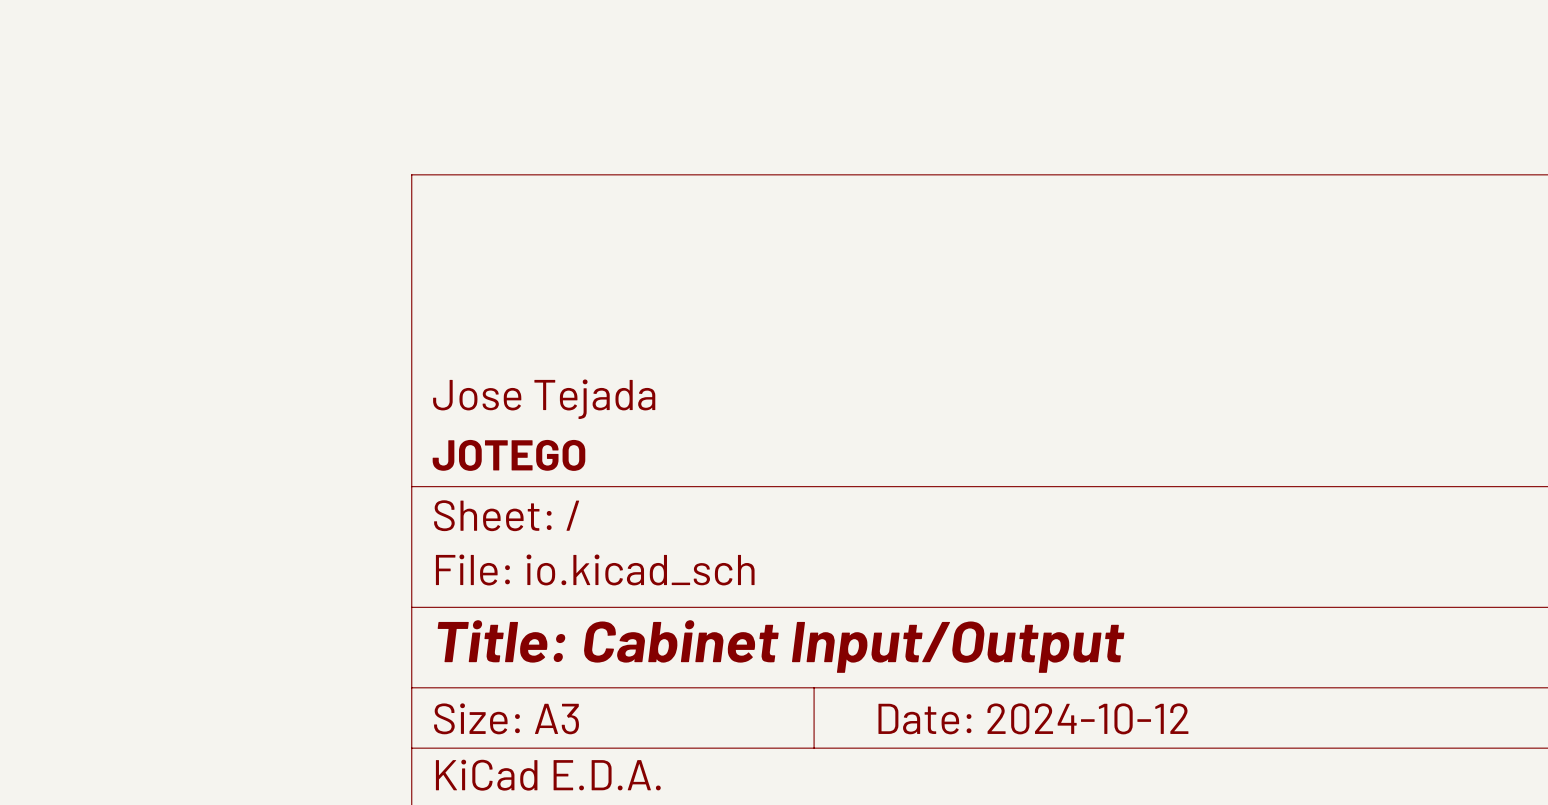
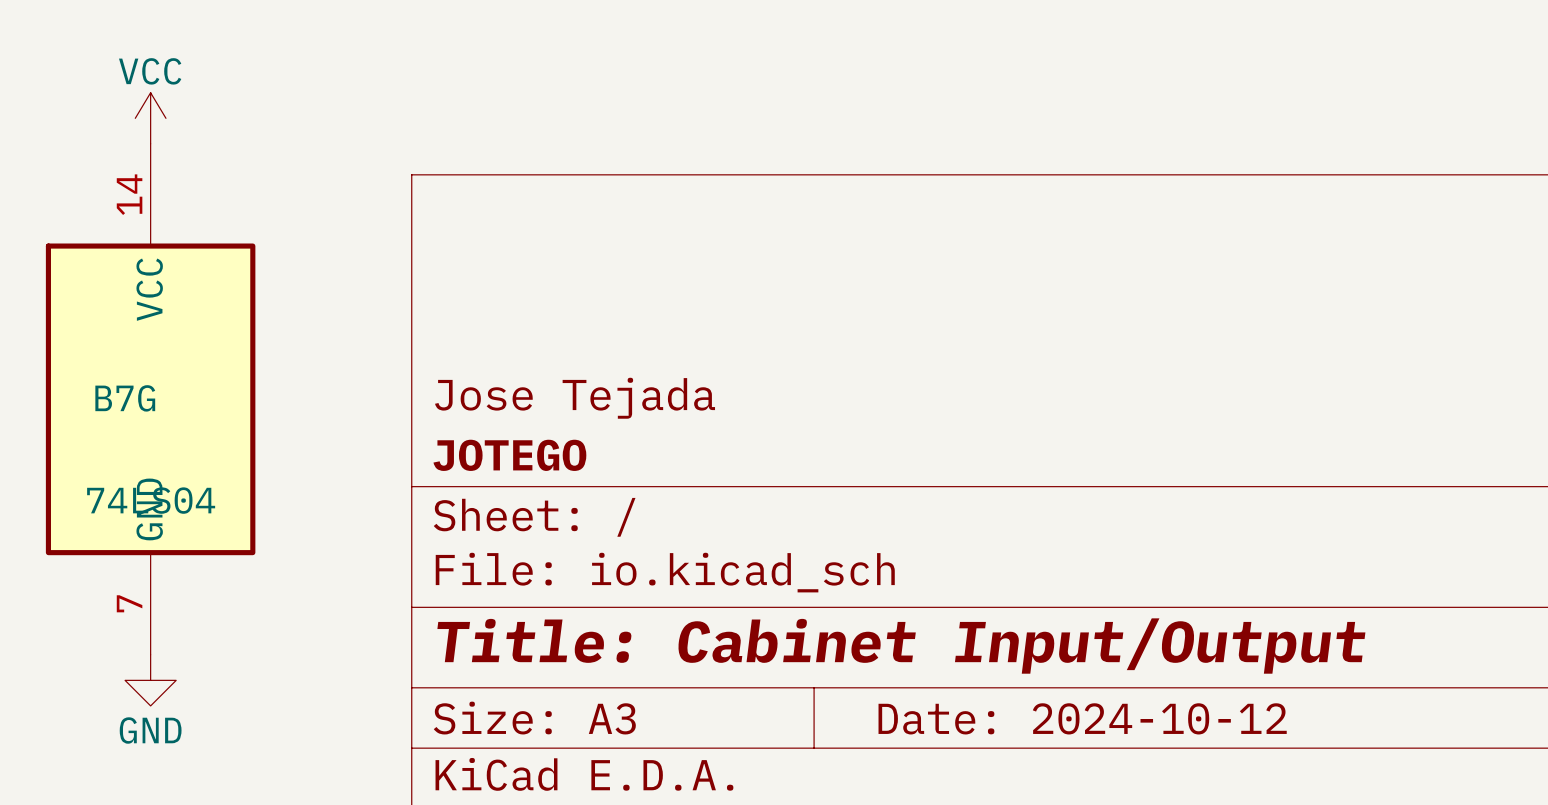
power symbol: none -> VCC (150, 118)
B7G: none -> 74LS04 (150, 399)
power symbol: none -> GND (150, 680)

